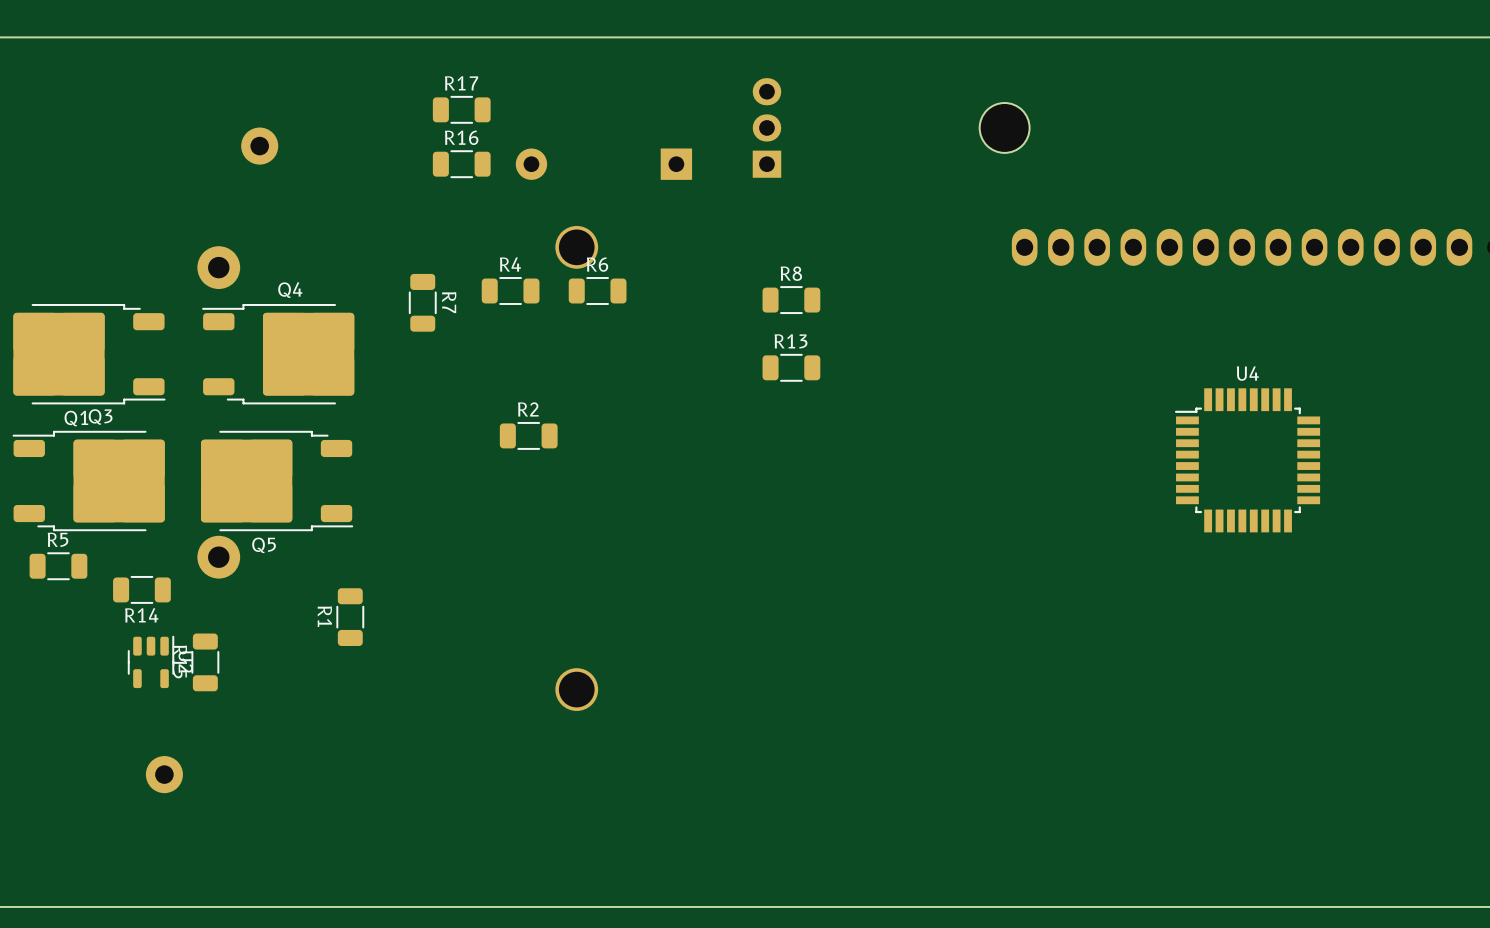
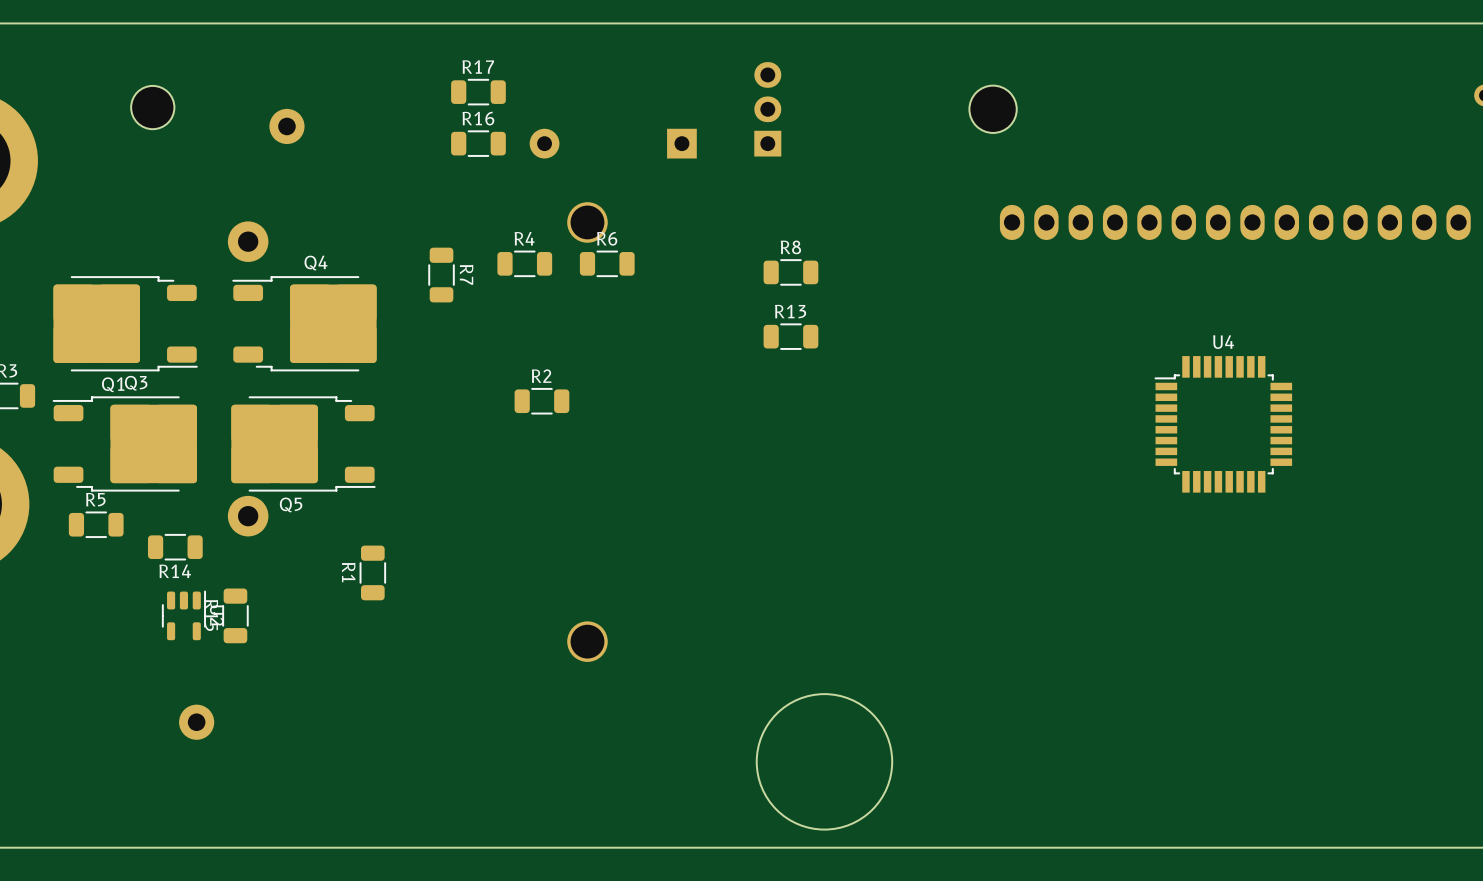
part: none -> (152, 107)
round board edge: none -> [756, 693, 893, 831]

